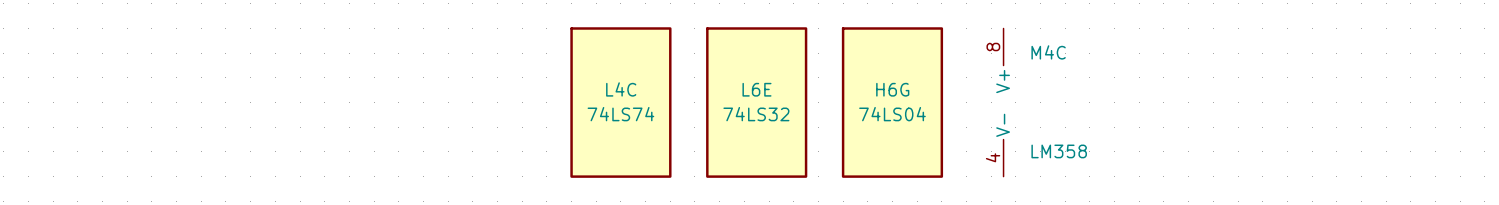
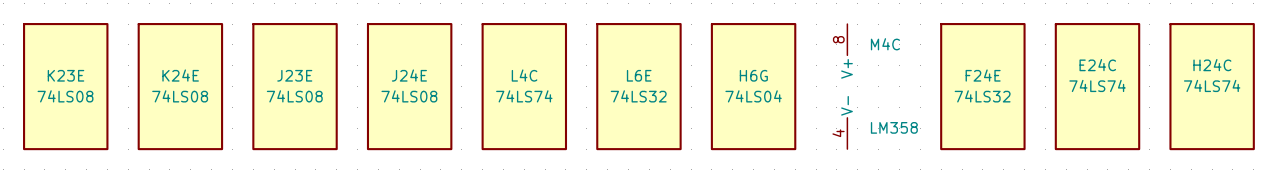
K23E: none -> 74LS08 (65, 86)
K24E: none -> 74LS08 (180, 86)
J23E: none -> 74LS08 (295, 86)
J24E: none -> 74LS08 (409, 86)
F24E: none -> 74LS32 (982, 86)
E24C: none -> 74LS74 (1097, 86)
H24C: none -> 74LS74 (1212, 86)

